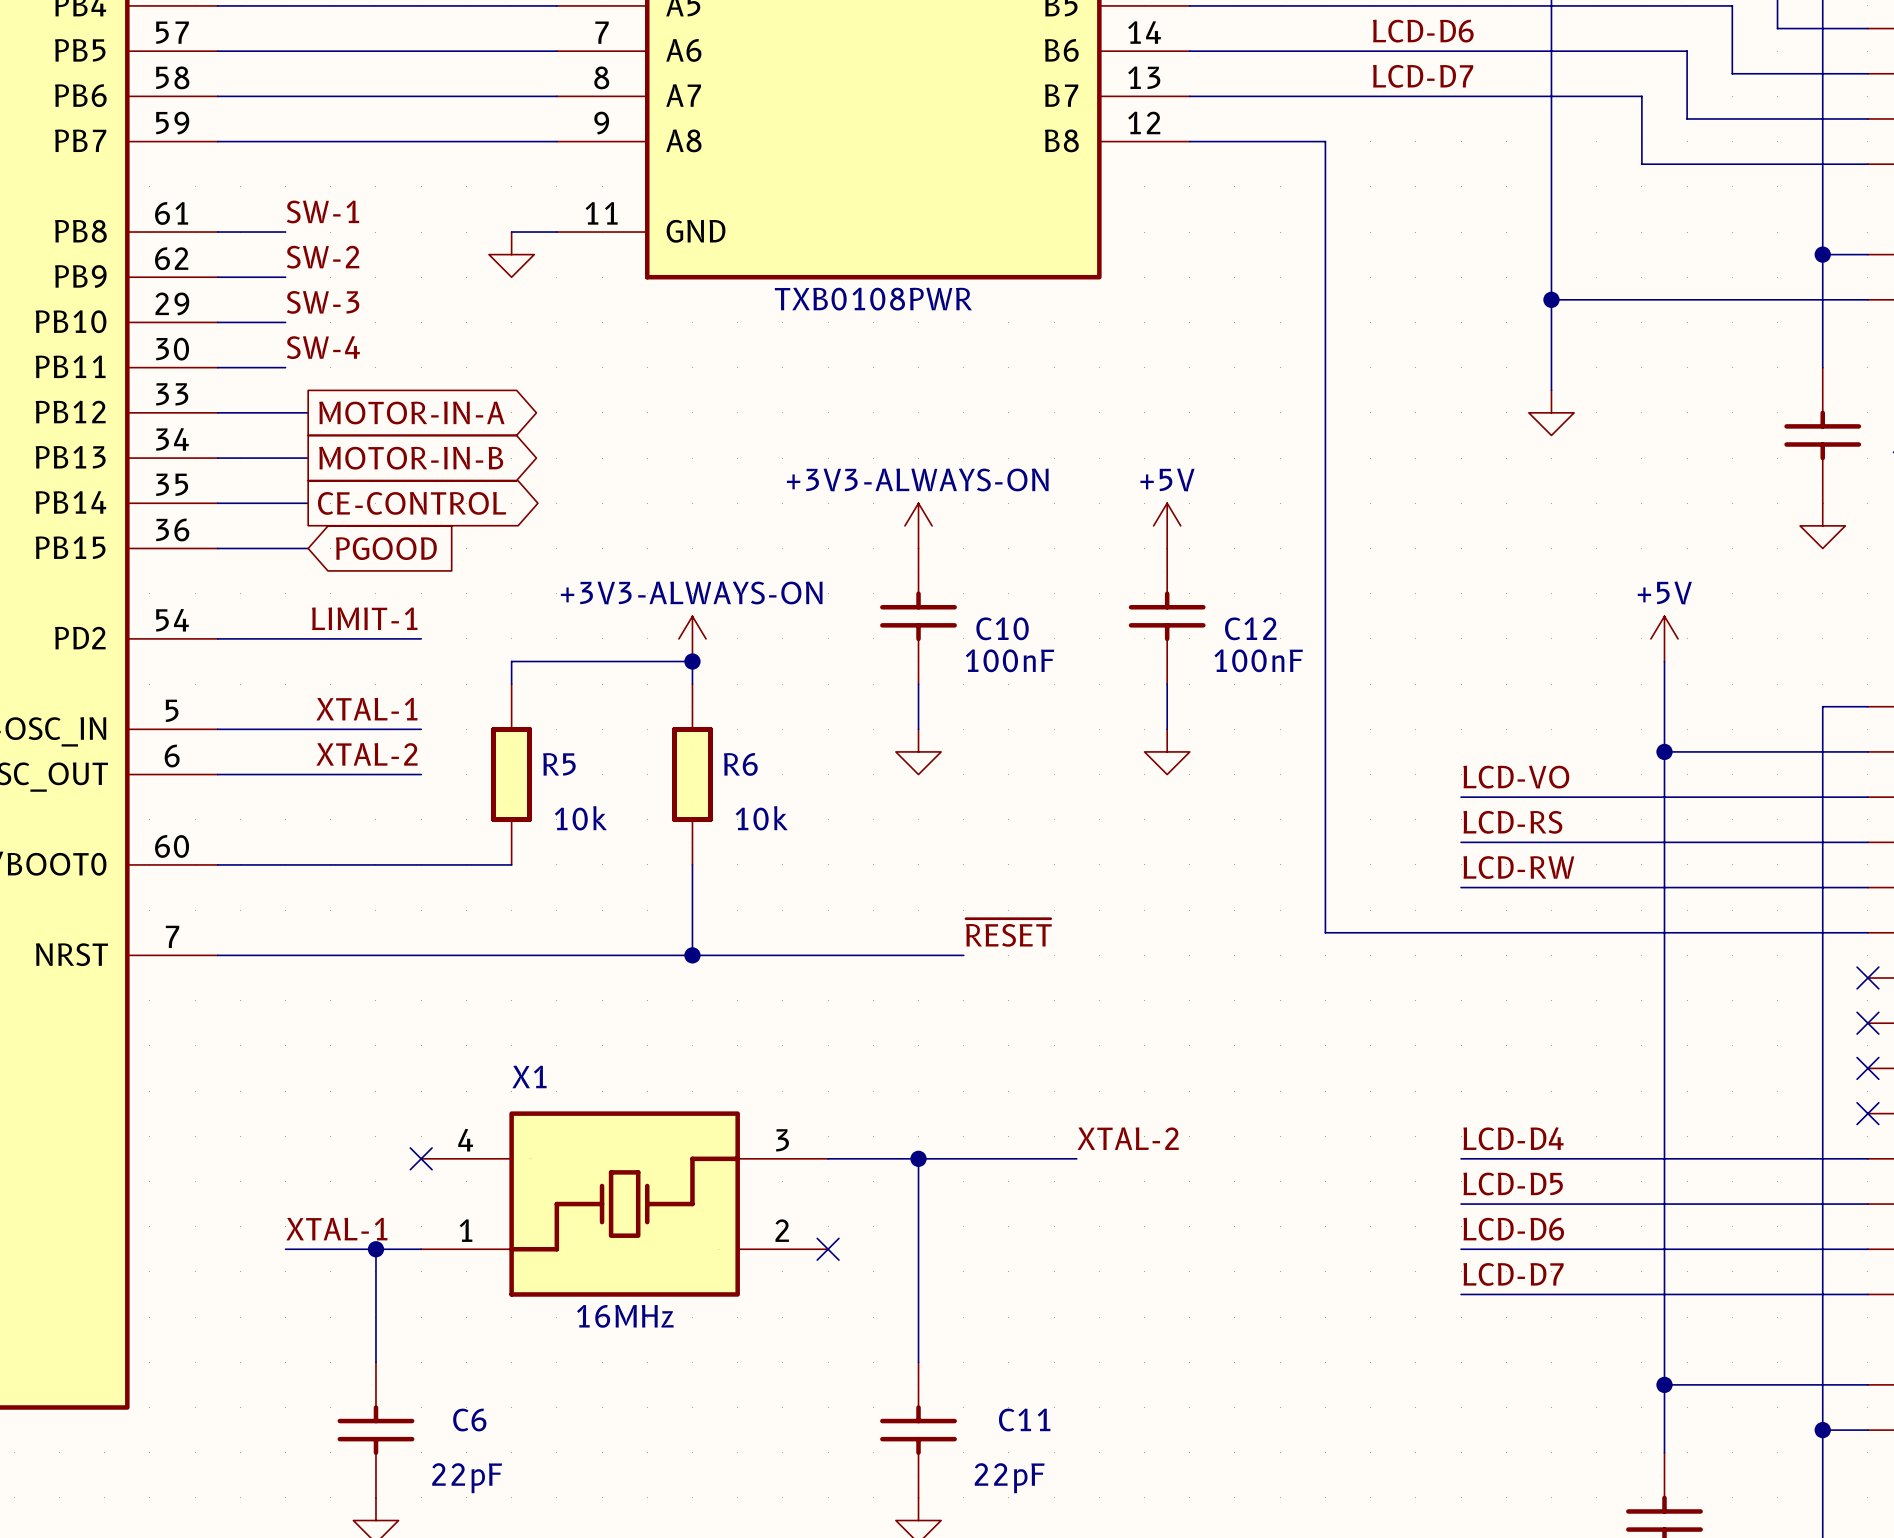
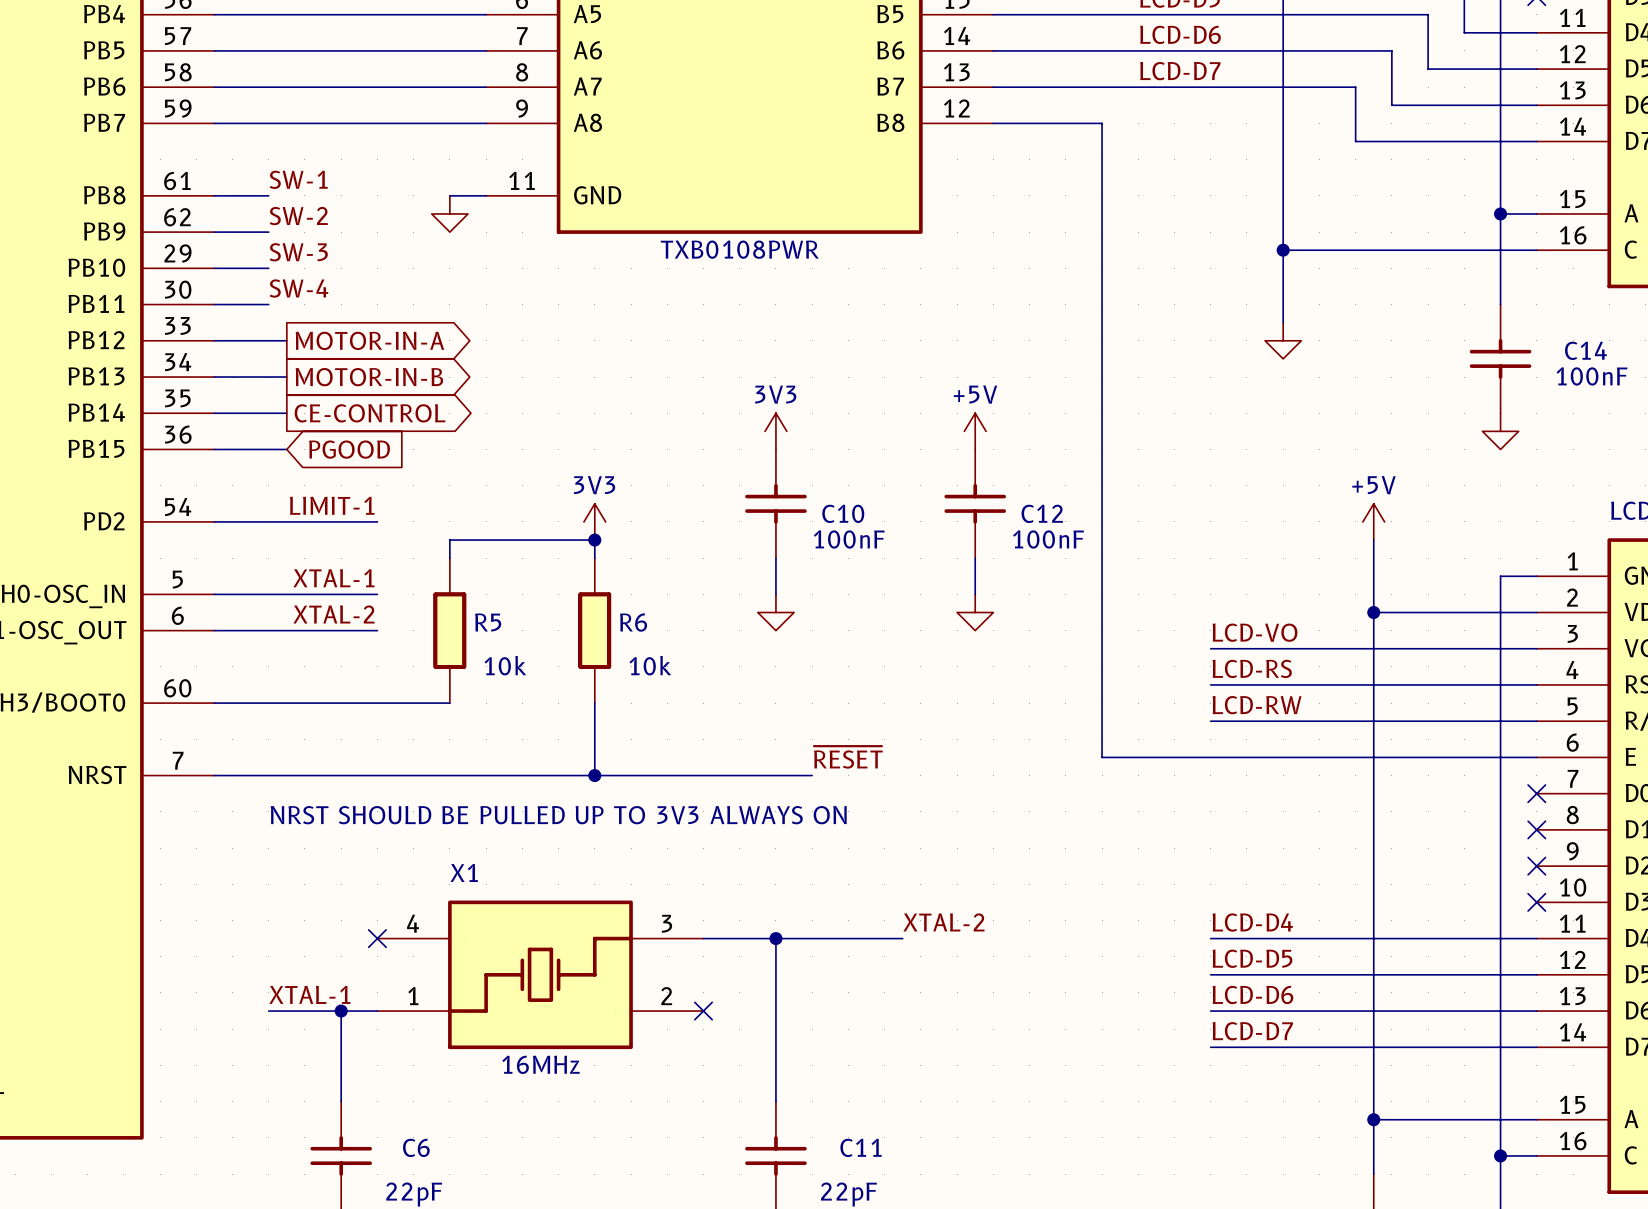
power symbol: +3V3-ALWAYS-ON (918, 525) -> 3V3 (775, 431)
power symbol: +3V3-ALWAYS-ON (692, 638) -> 3V3 (594, 521)
text: none -> NRST SHOULD BE PULLED UP TO 3V3 ALWAYS ON (558, 815)

